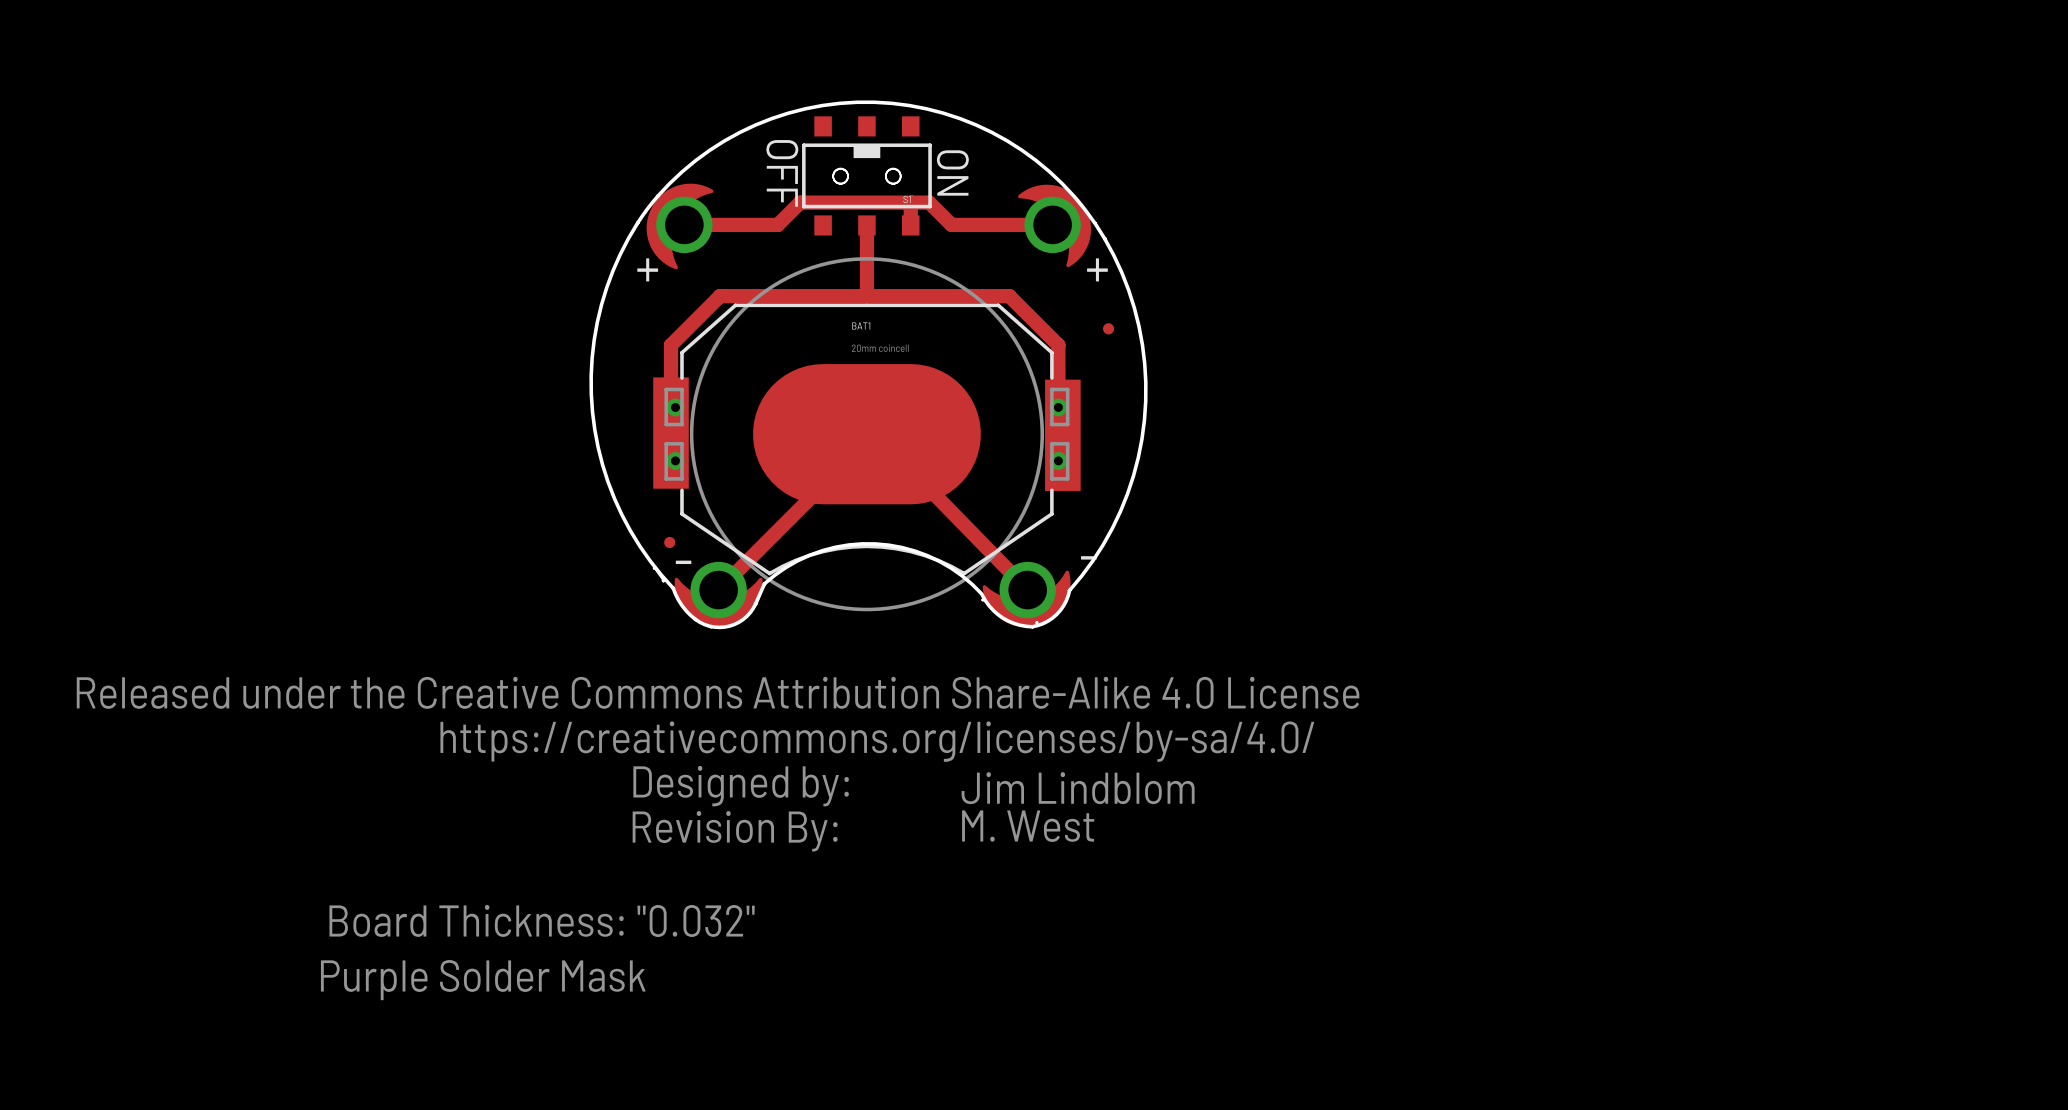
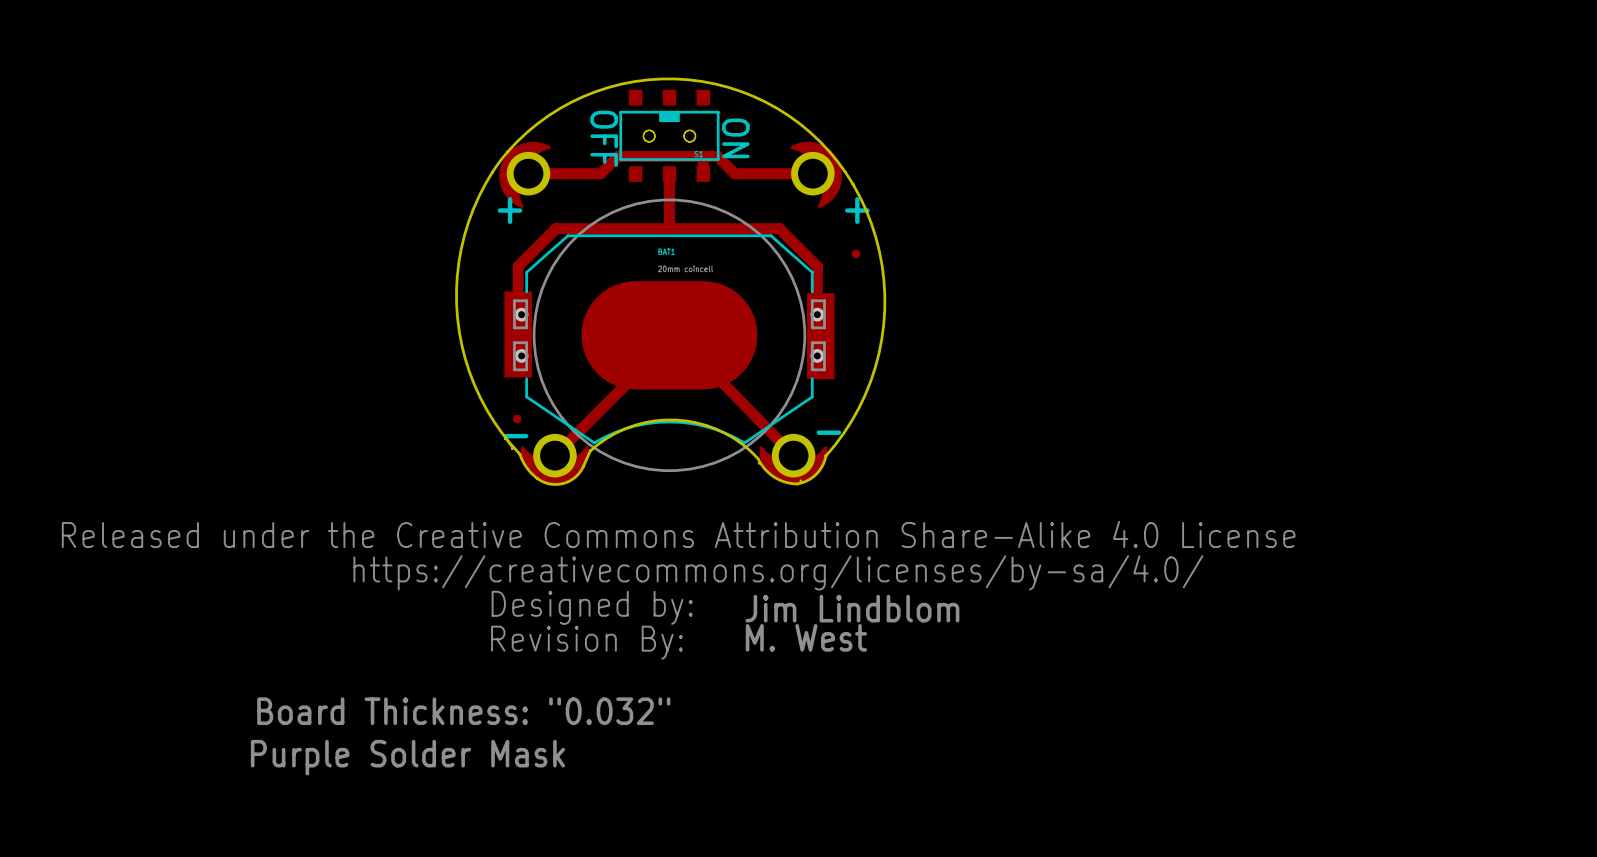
part rotation: 0° (1054, 225) -> 10° clockwise (816, 174)
part rotation: 0° (1026, 594) -> 10° clockwise (793, 458)

